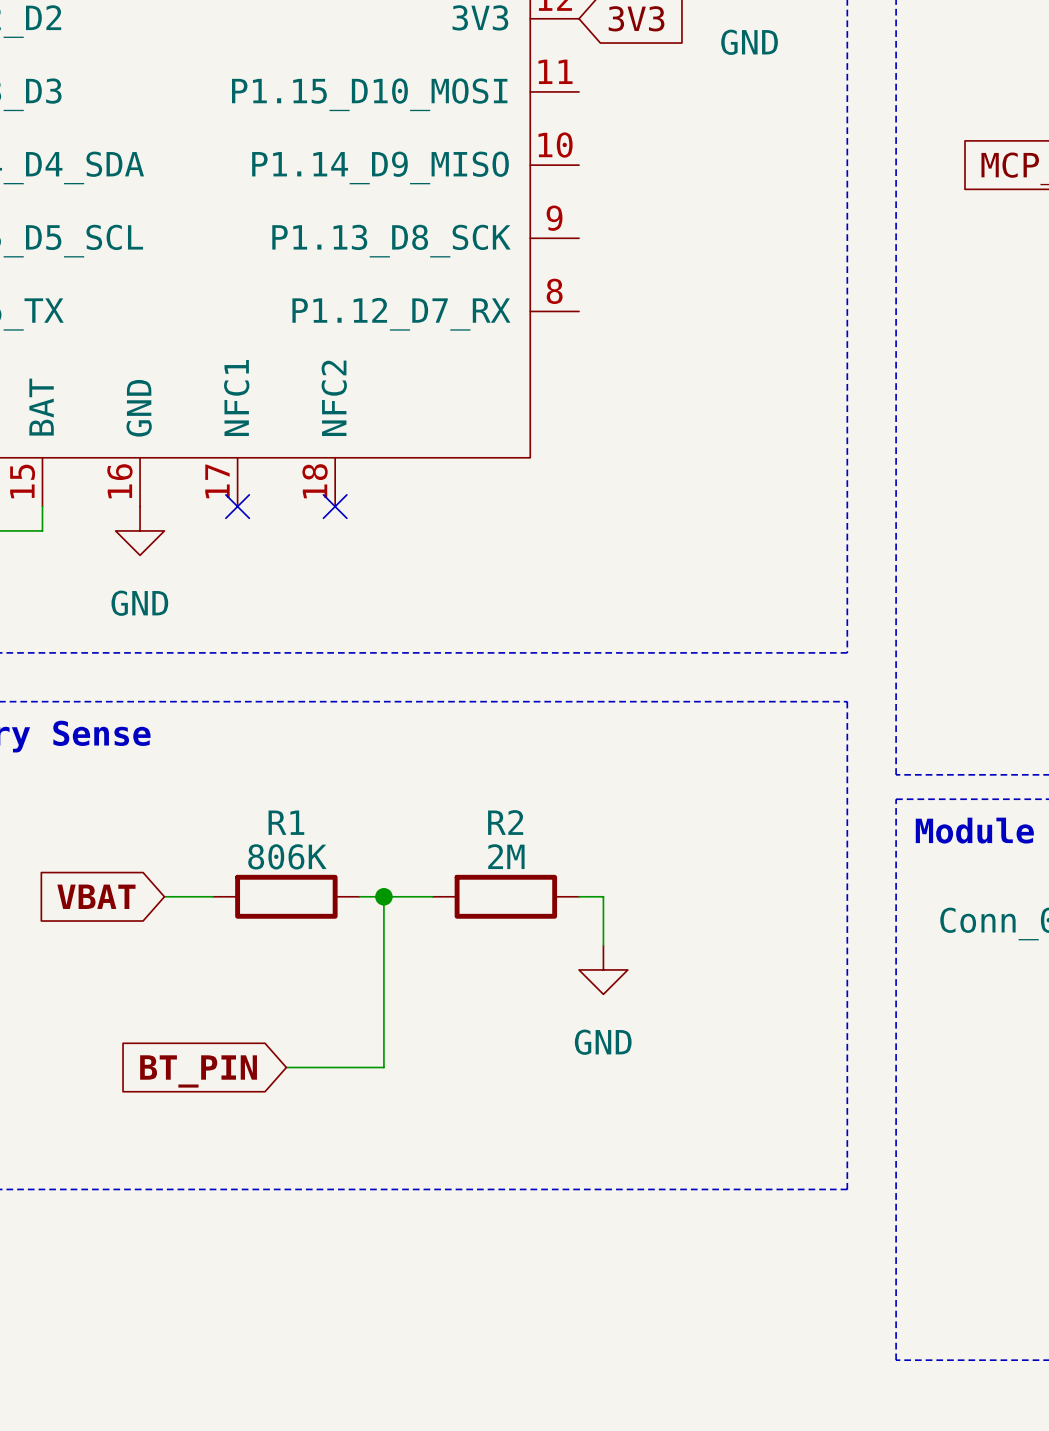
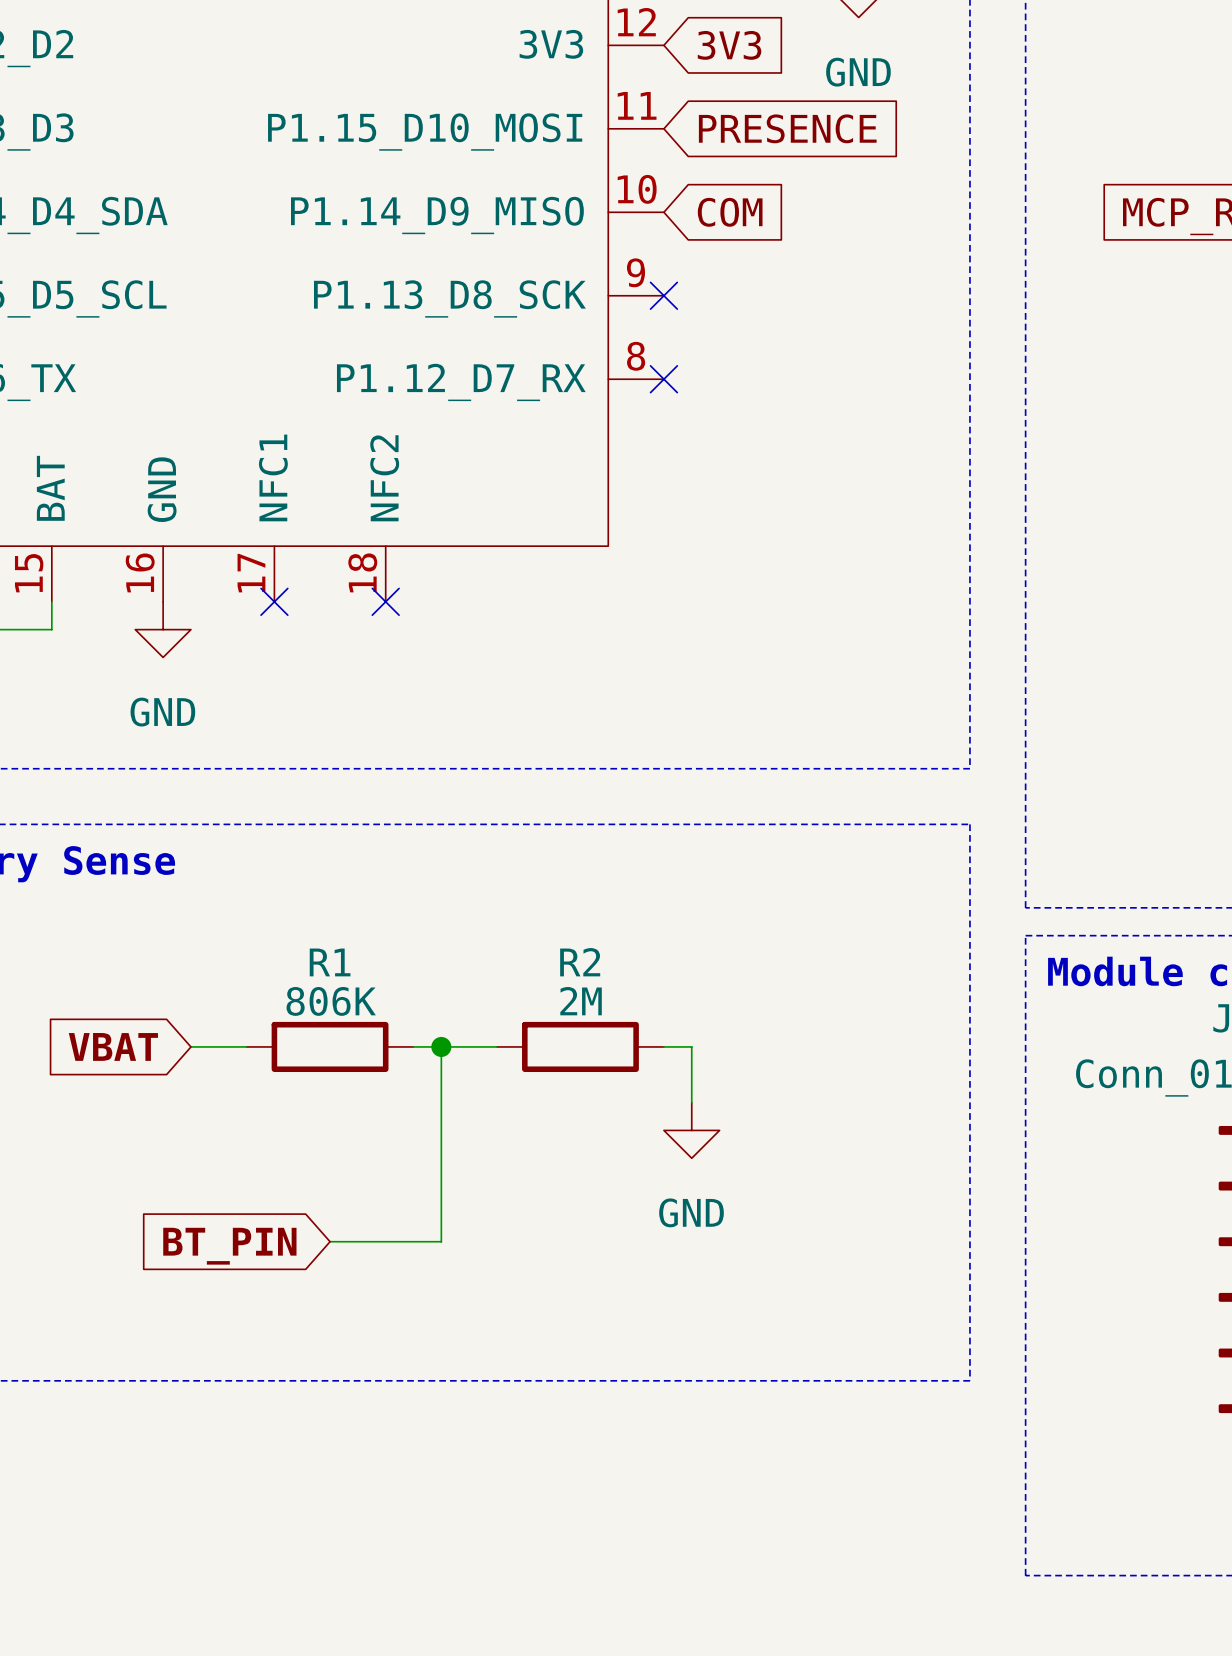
global label: none -> PRESENCE (787, 128)
global label: none -> COM (730, 212)
no-connect mark: none -> (663, 295)
no-connect mark: none -> (663, 379)

